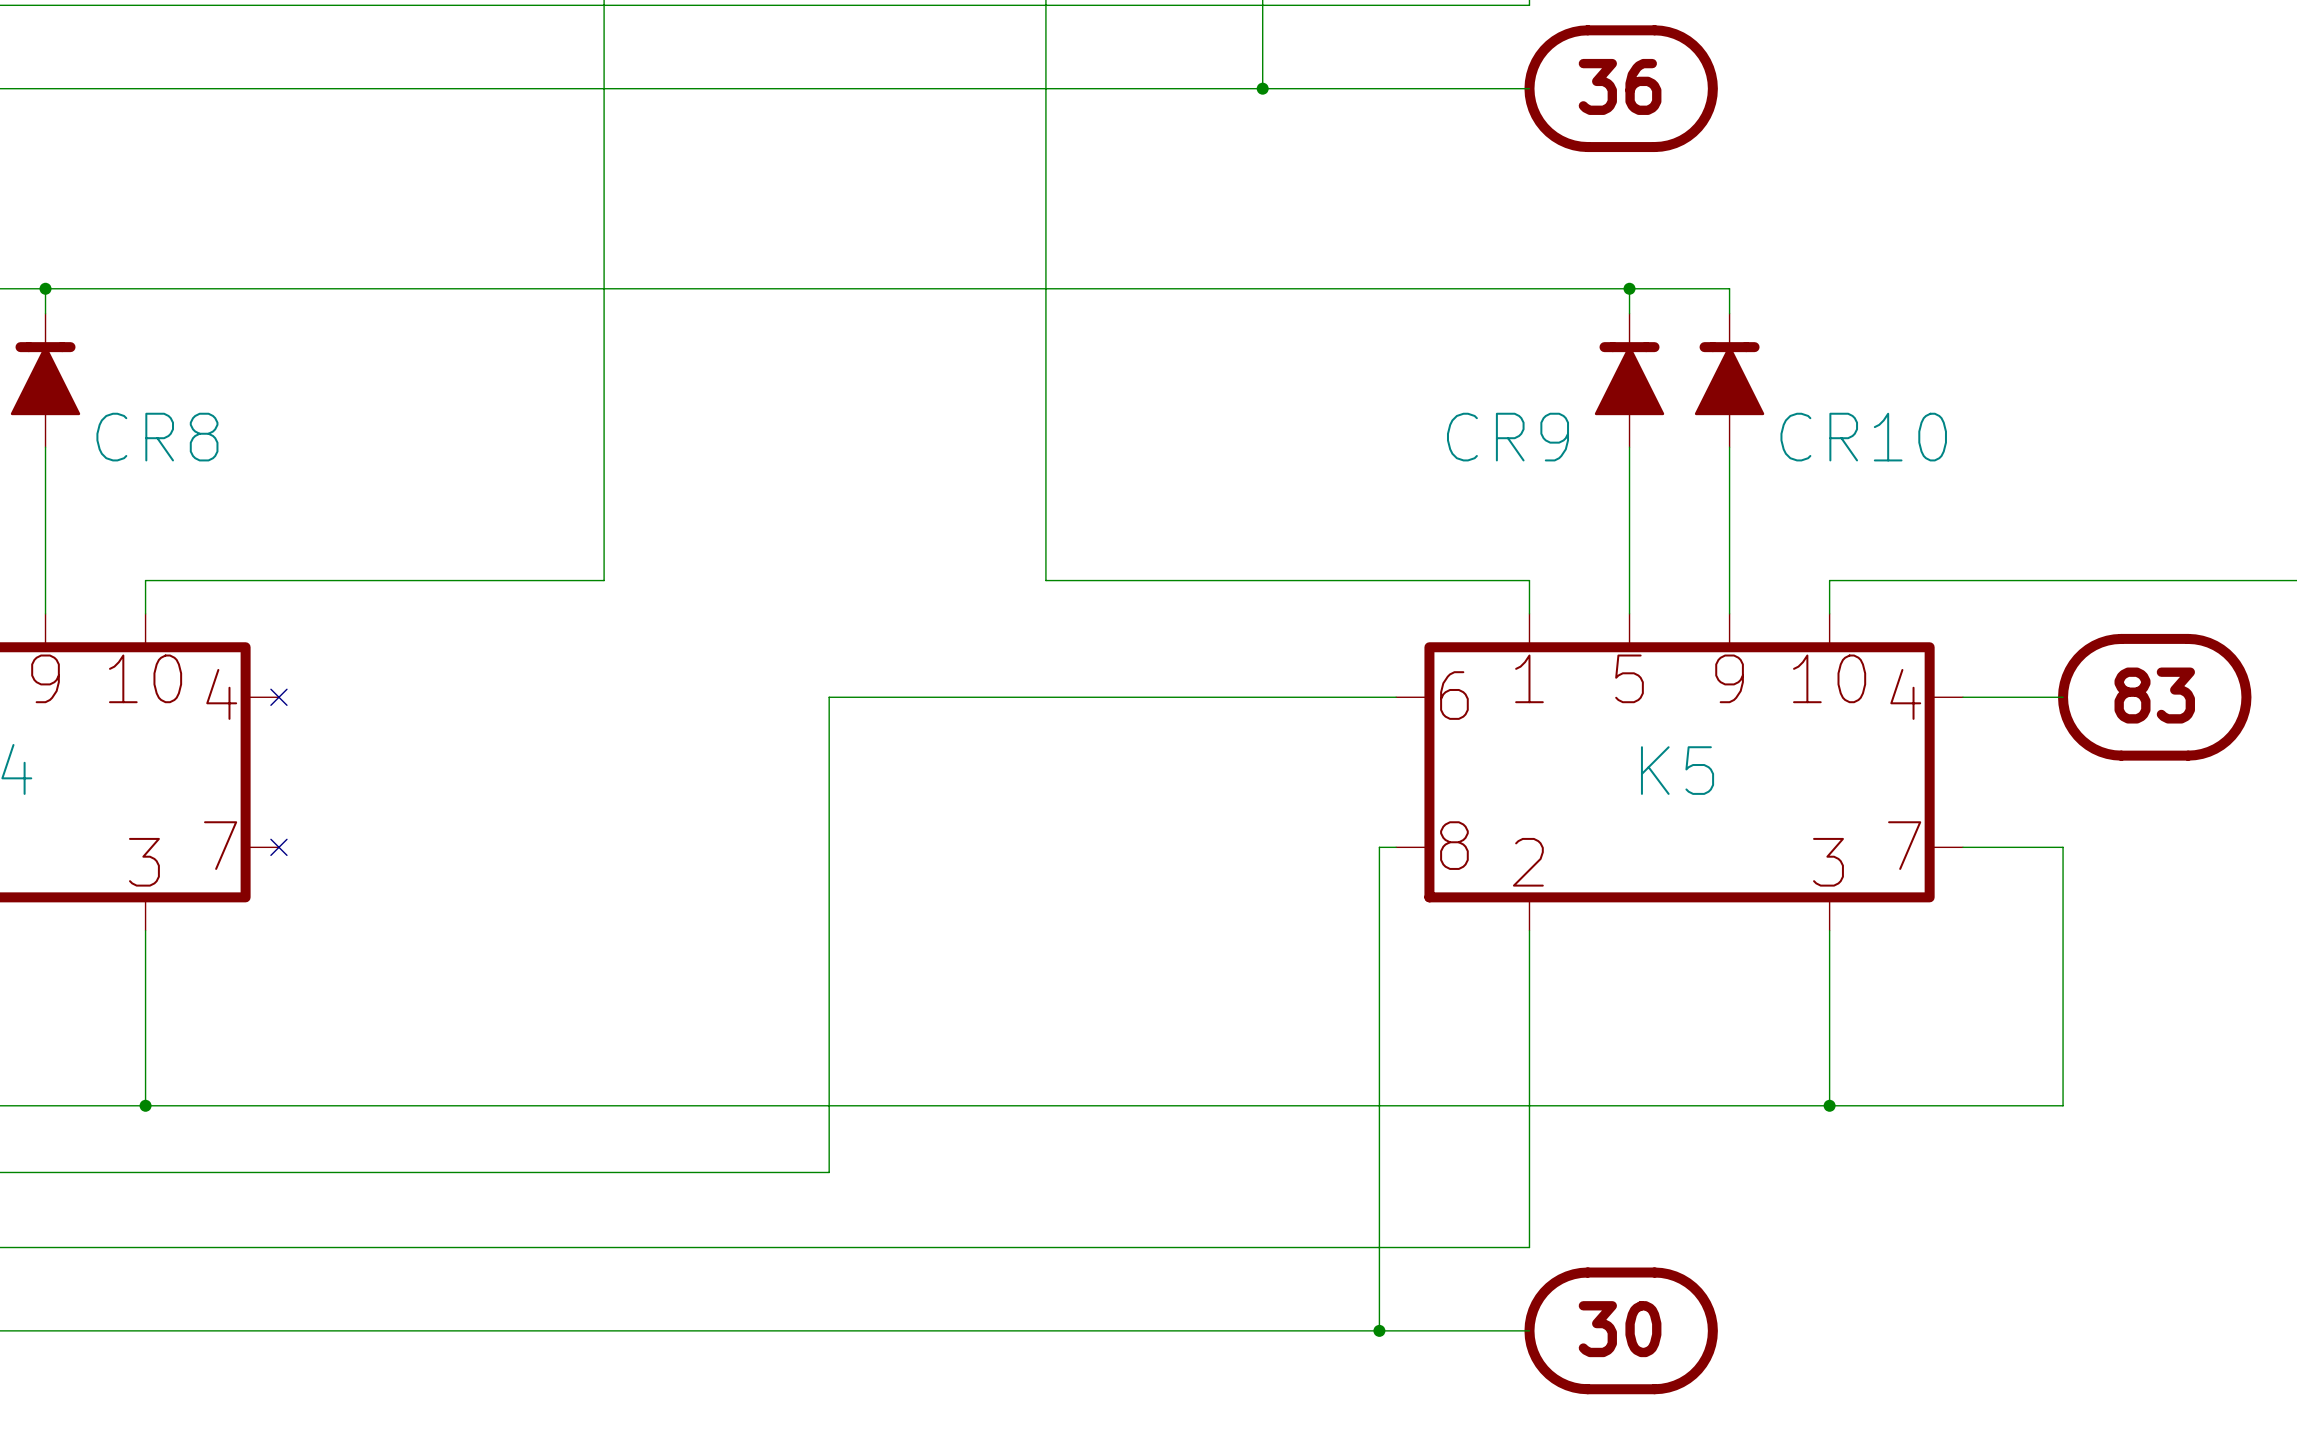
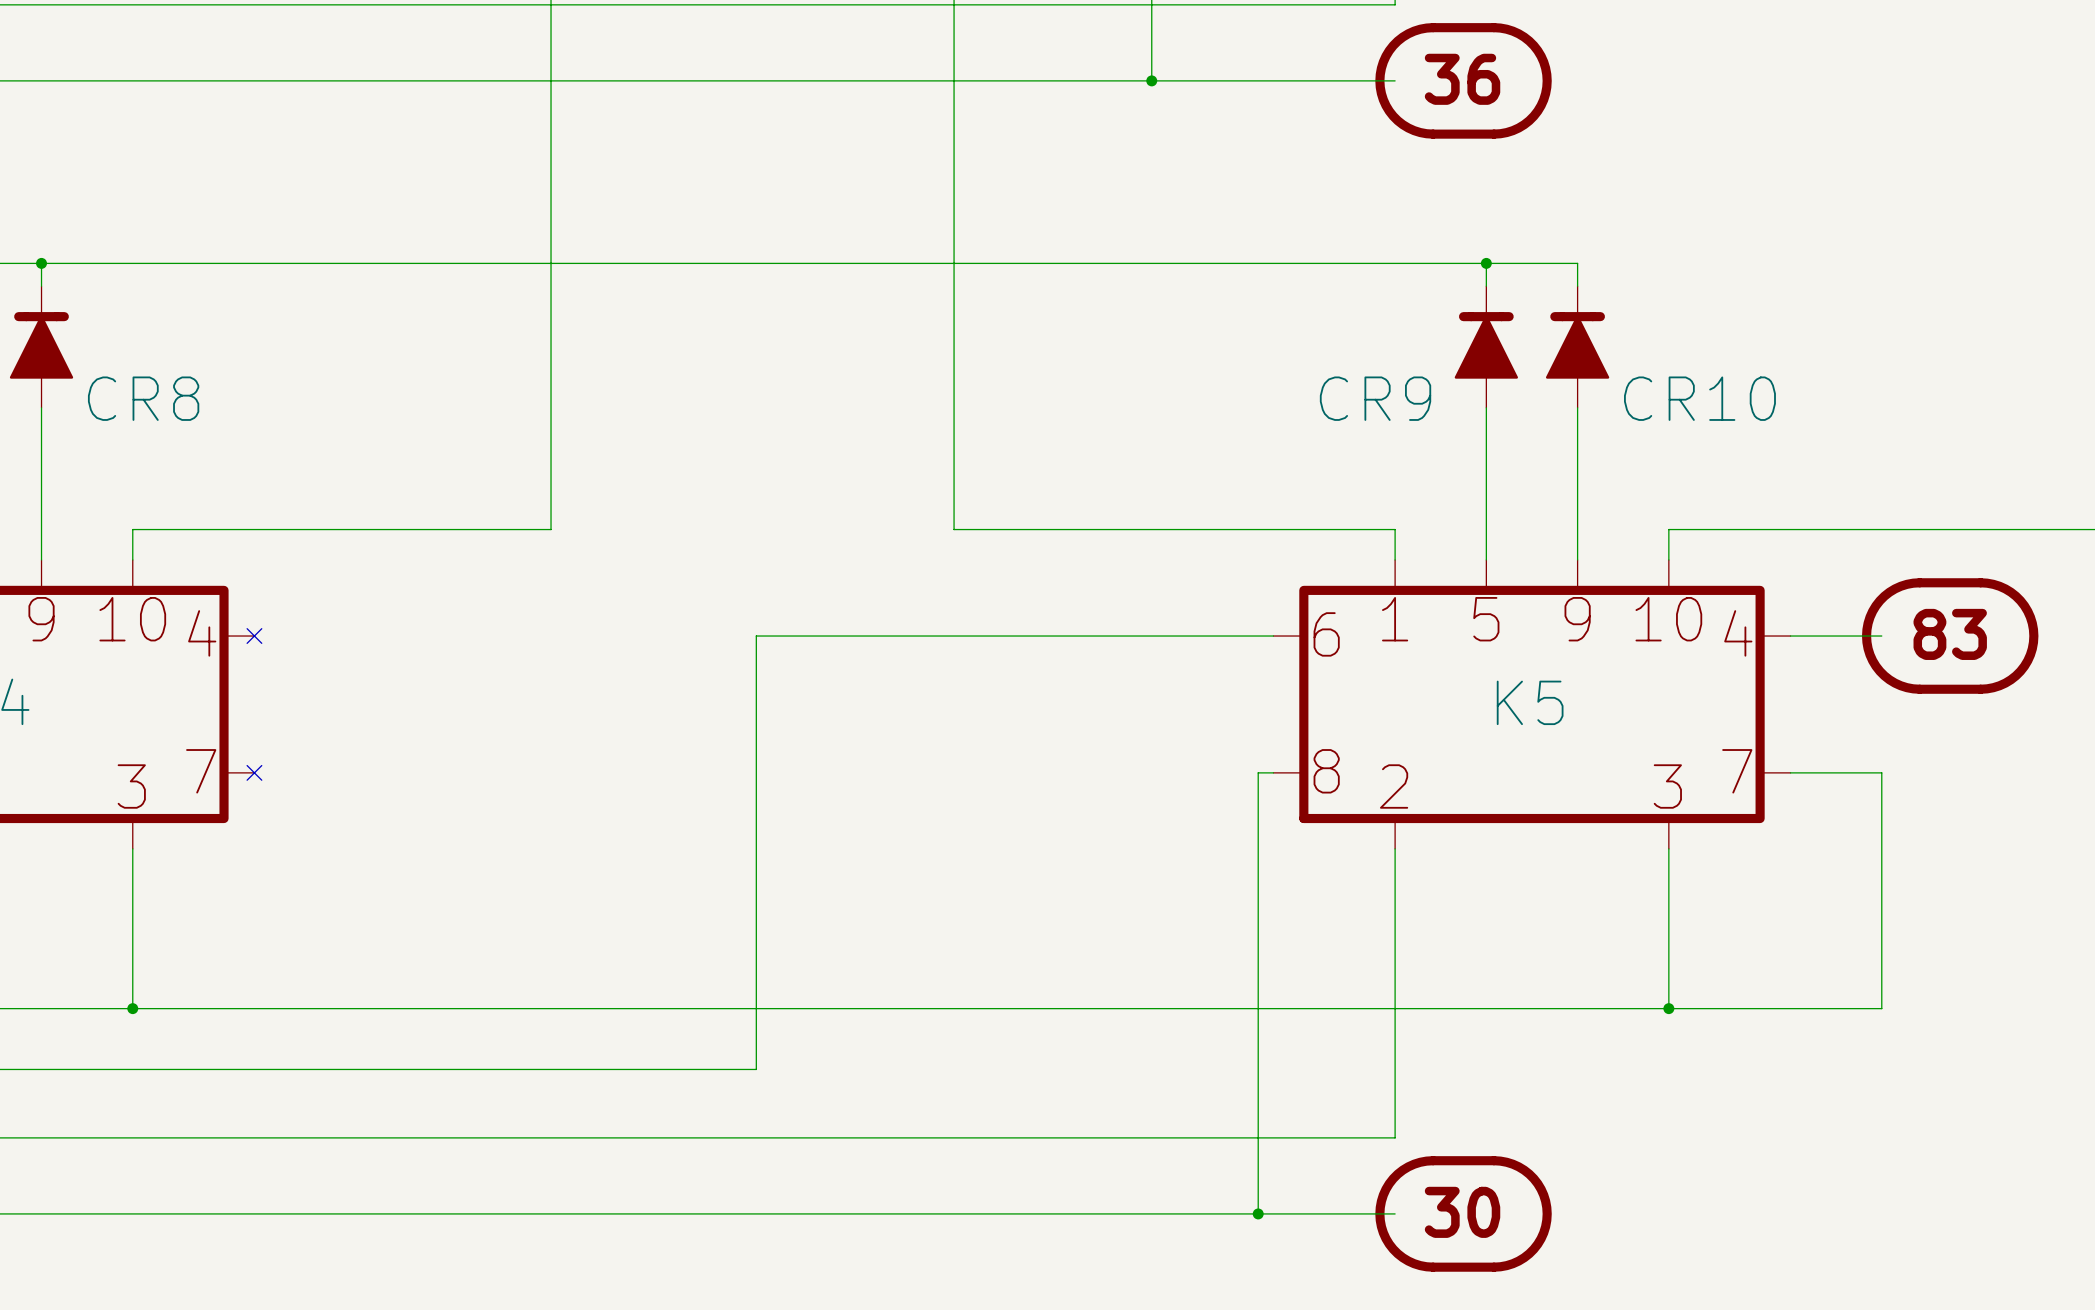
part position: (1621, 88) -> (1463, 80)
part position: (2154, 697) -> (1950, 636)
part position: (1621, 1330) -> (1463, 1213)

